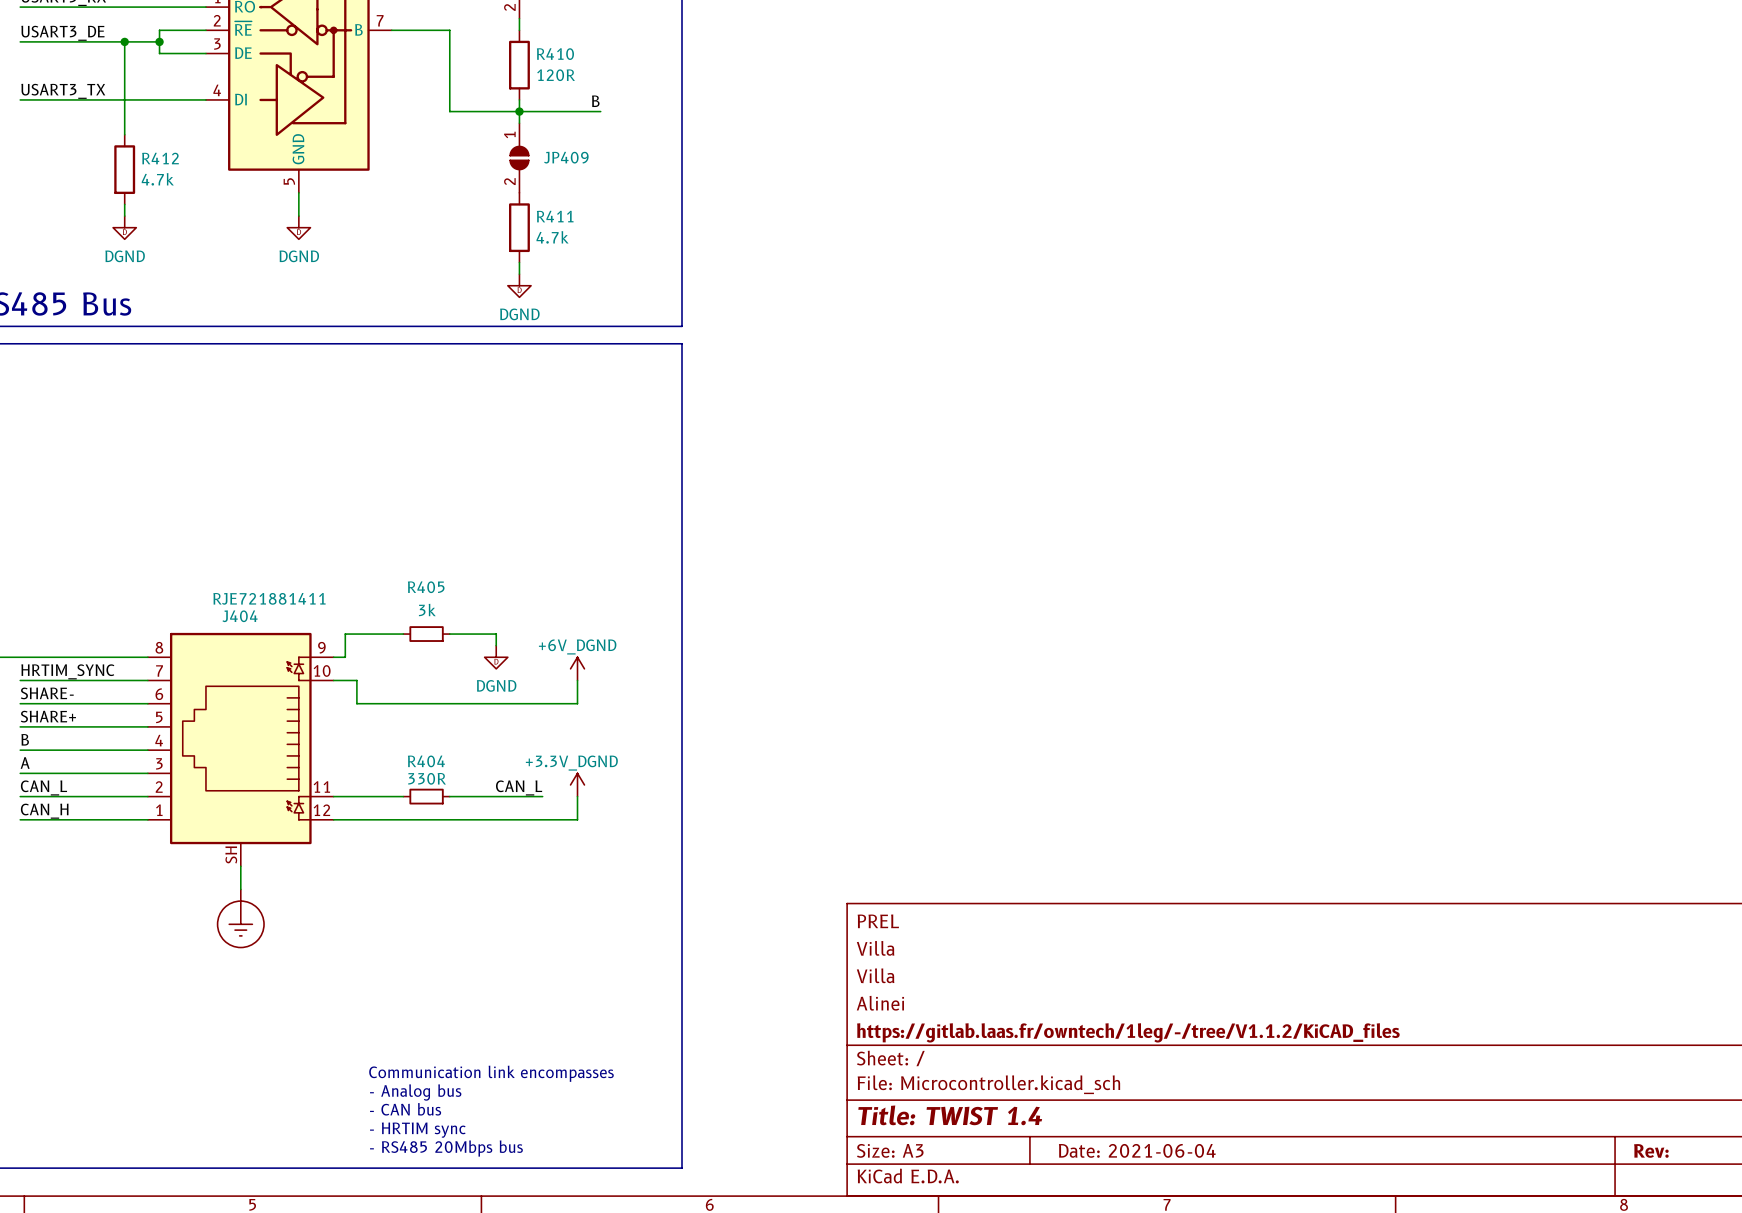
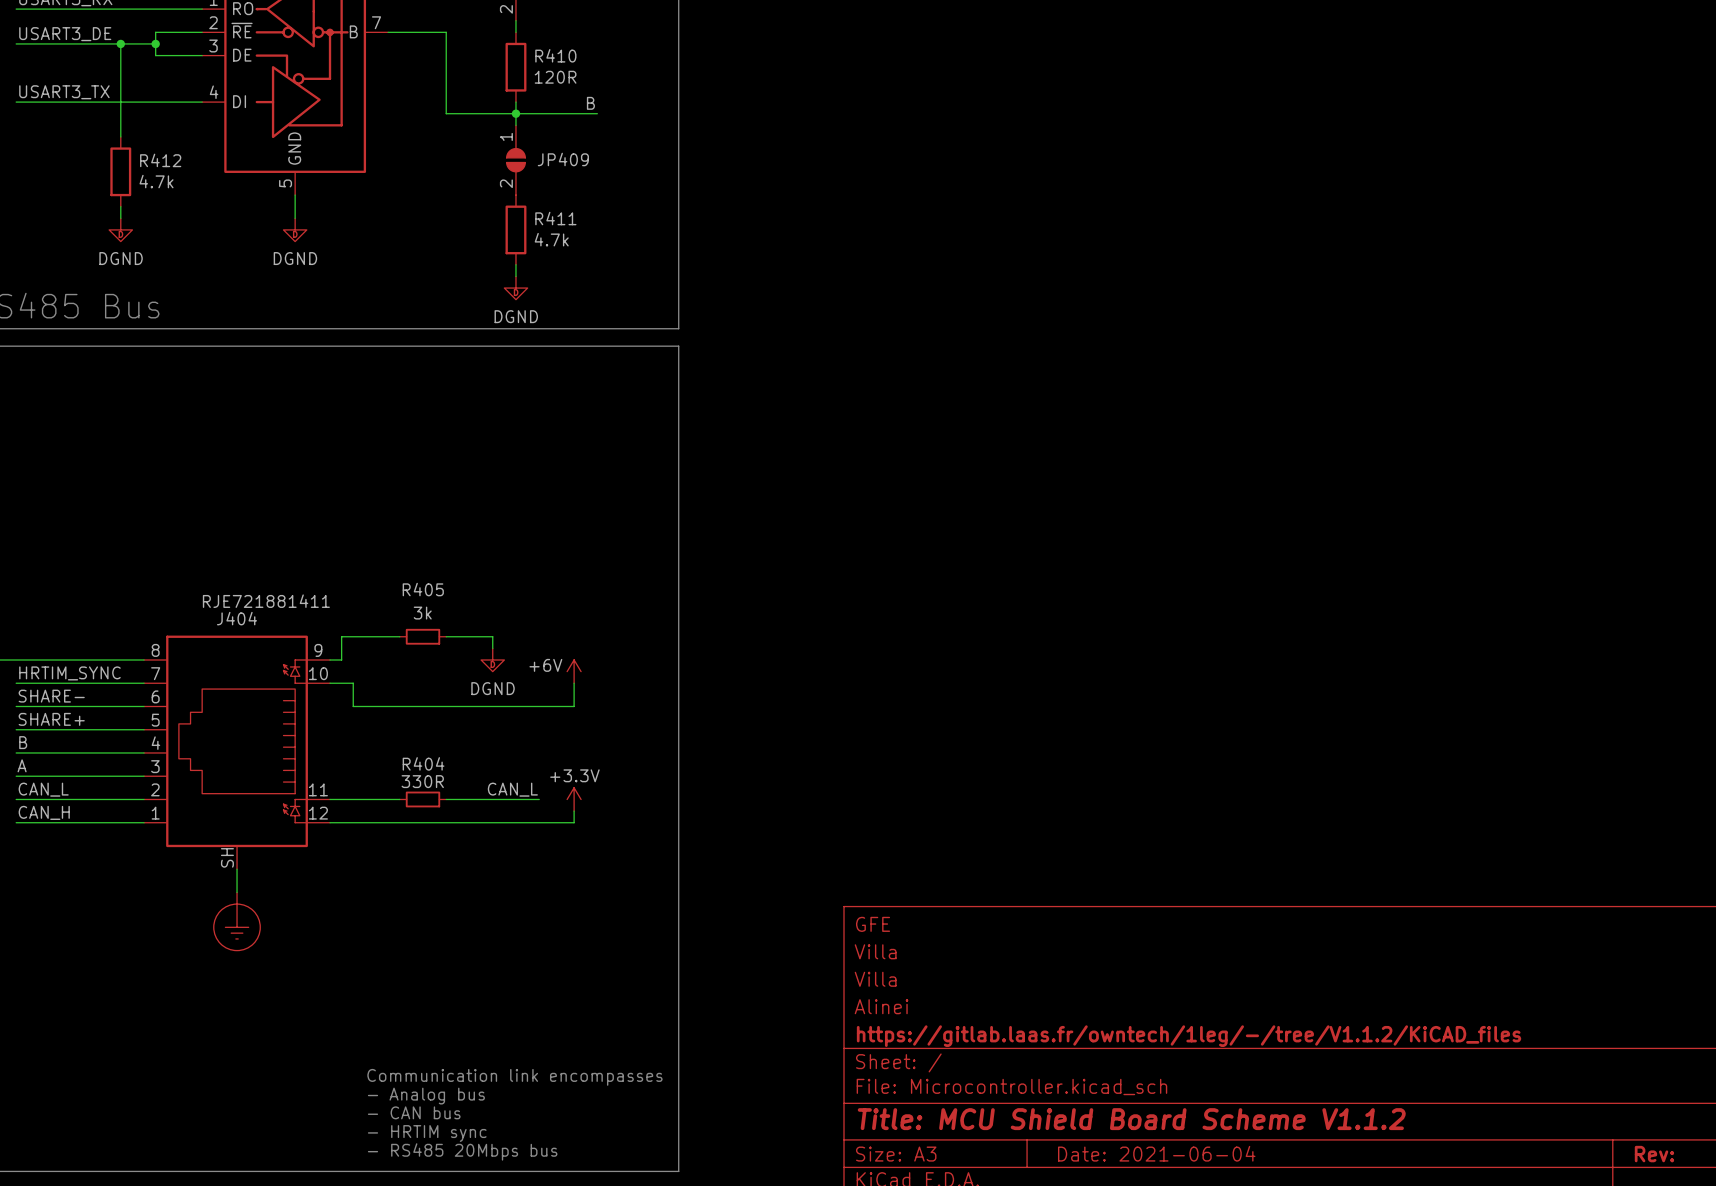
power symbol: +6V_DGND (577, 668) -> +6V (574, 671)
power symbol: +3.3V_DGND (577, 784) -> none
power symbol: none -> +3.3V (574, 799)
title block: PREL (878, 921) -> GFE (873, 924)
title block: Title: TWIST 1.4 (950, 1115) -> Title: MCU Shield Board Scheme V1.1.2 (1131, 1119)

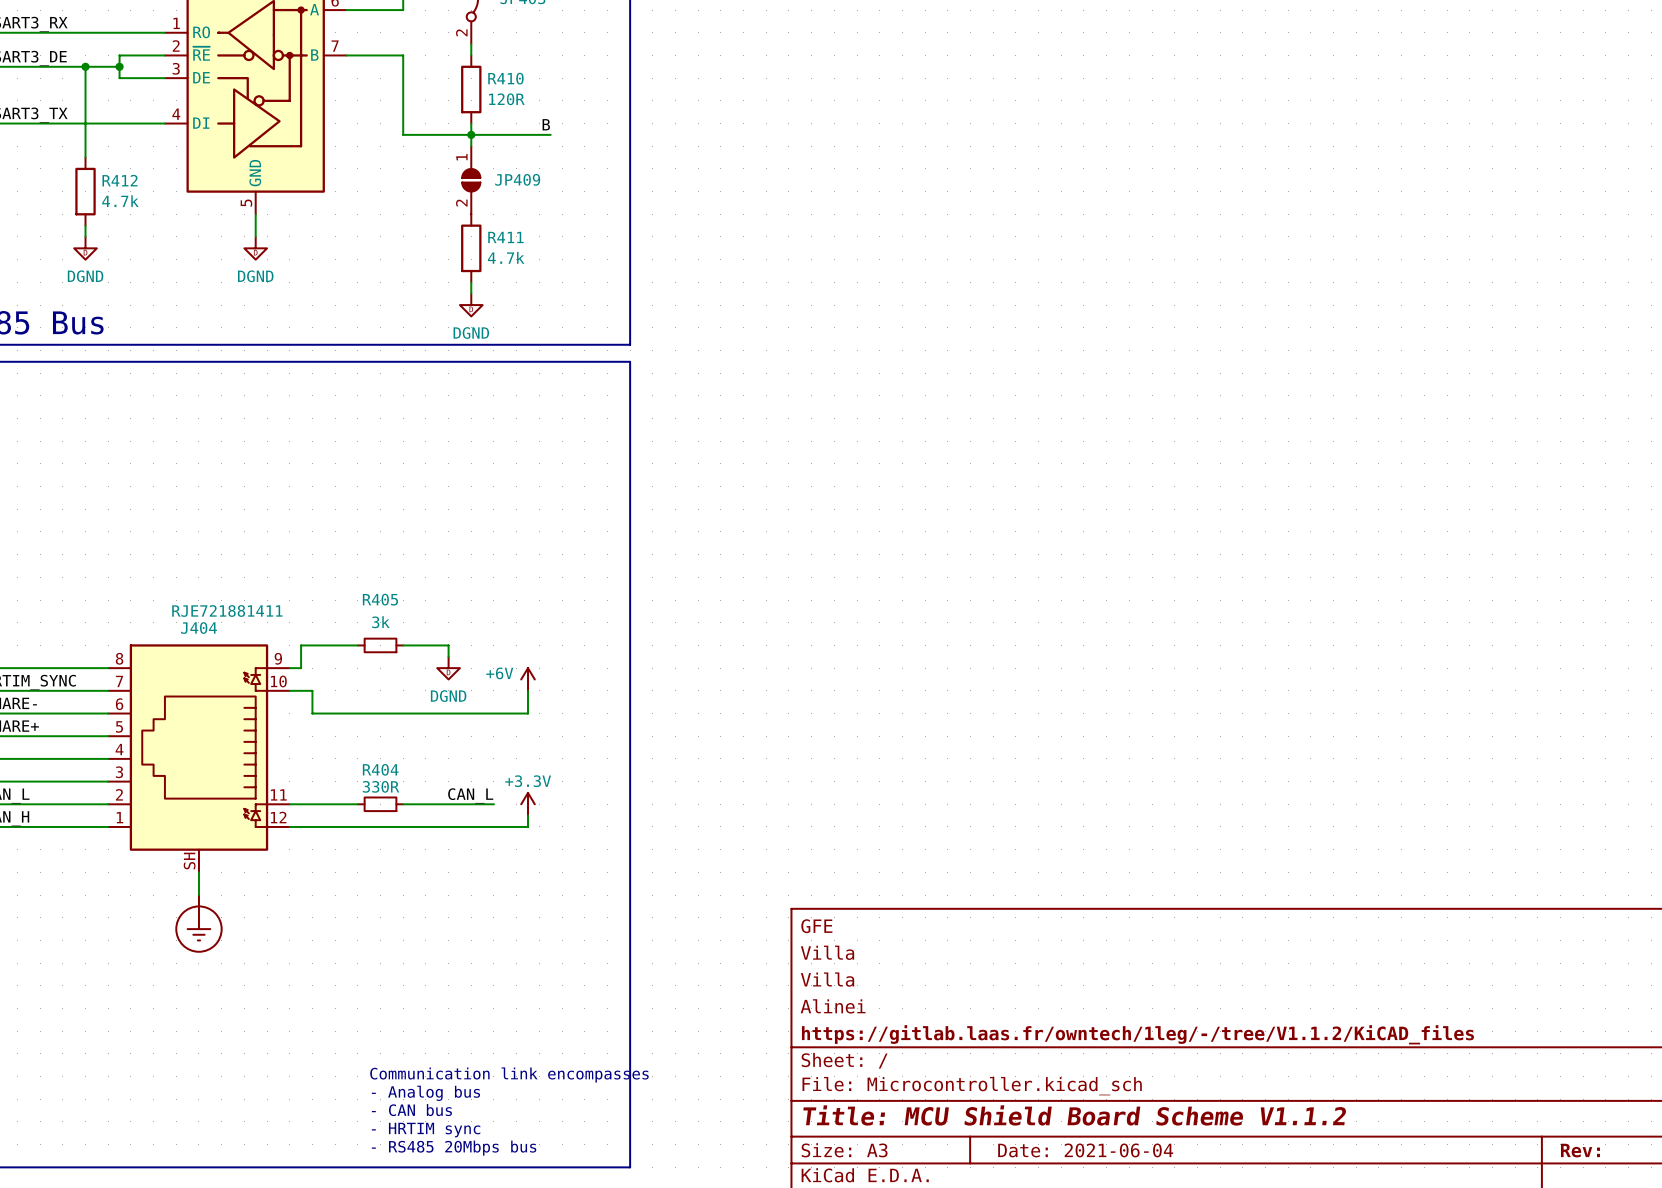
text position: Communication link encompasses (514, 1077) -> Communication link encompasses (509, 1074)
text position: - Analog bus (426, 1096) -> - Analog bus (425, 1093)
text position: - CAN bus (414, 1112) -> - CAN bus (411, 1110)
text position: - HRTIM sync (427, 1133) -> - HRTIM sync (426, 1130)
text position: - RS485 20Mbps bus (462, 1151) -> - RS485 20Mbps bus (454, 1148)

